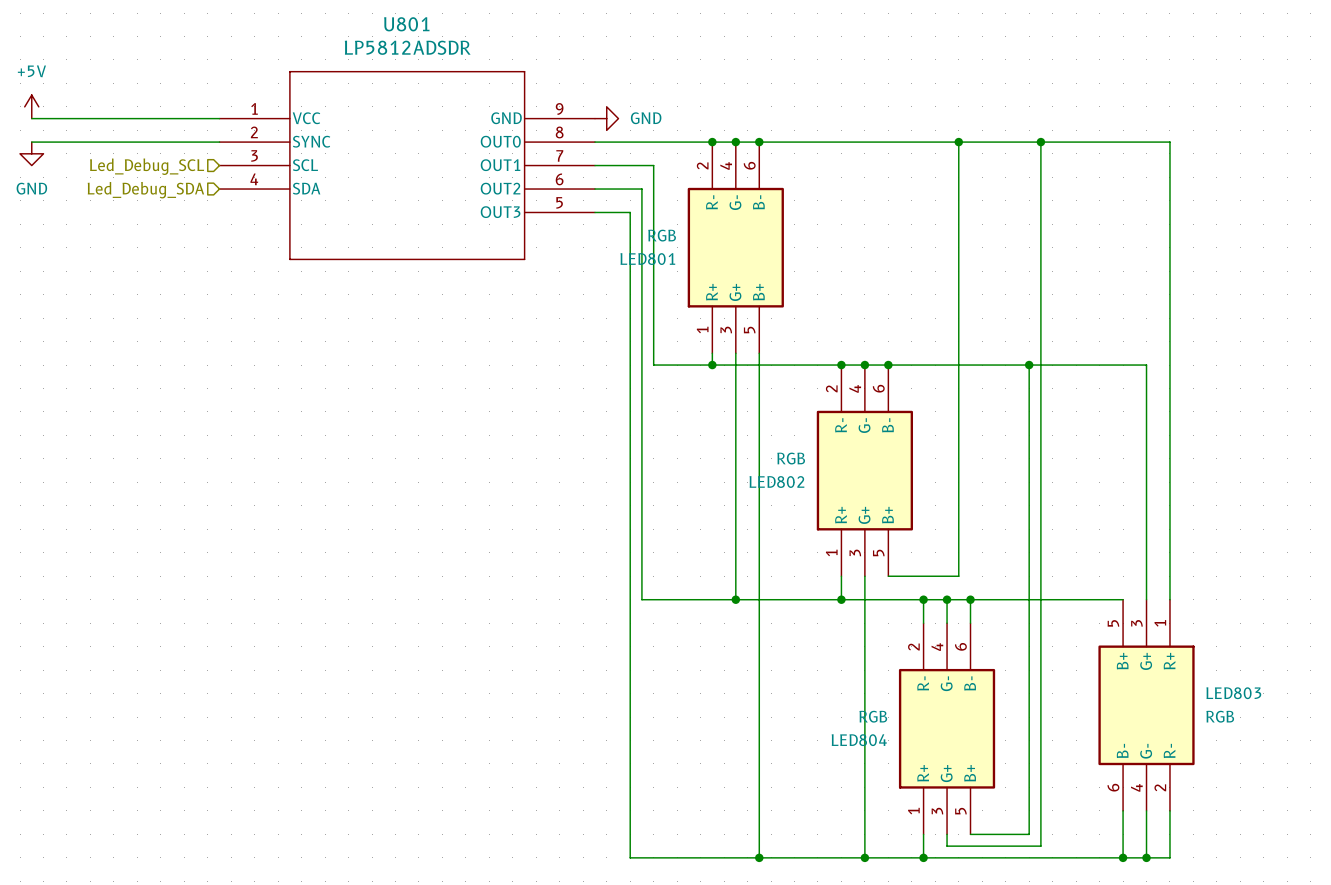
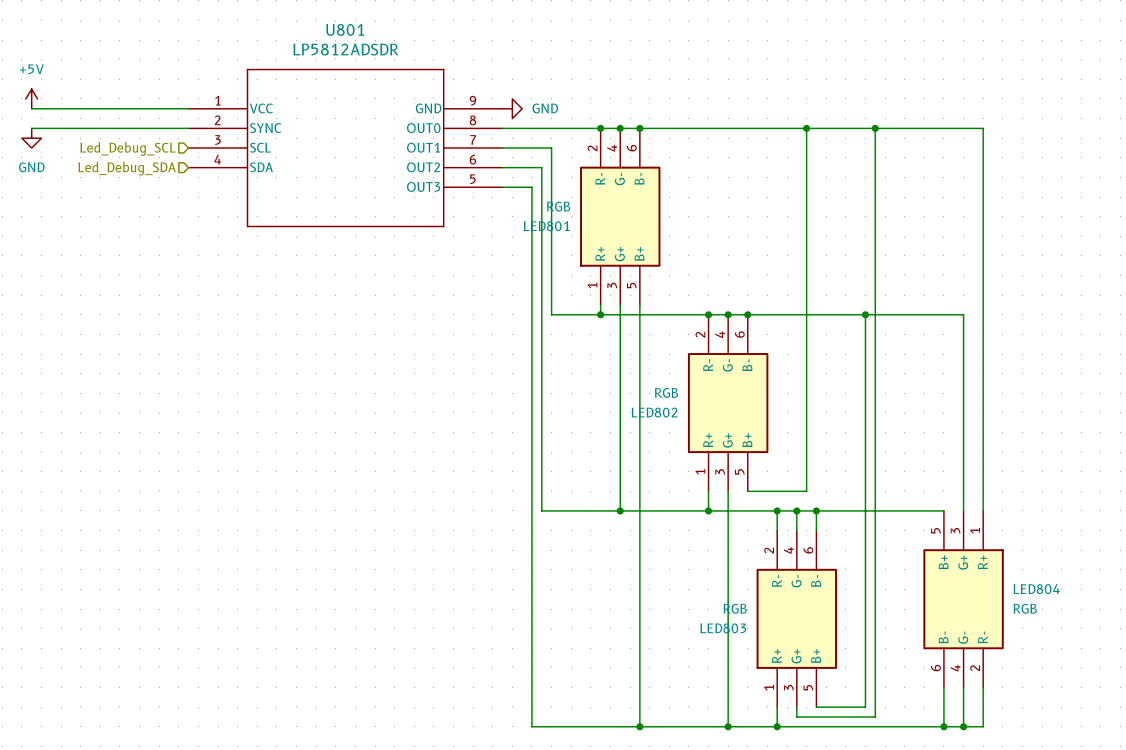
LED803 name: LED803 (1233, 693) -> LED804 (1036, 589)
LED804 name: LED804 (859, 740) -> LED803 (723, 628)

